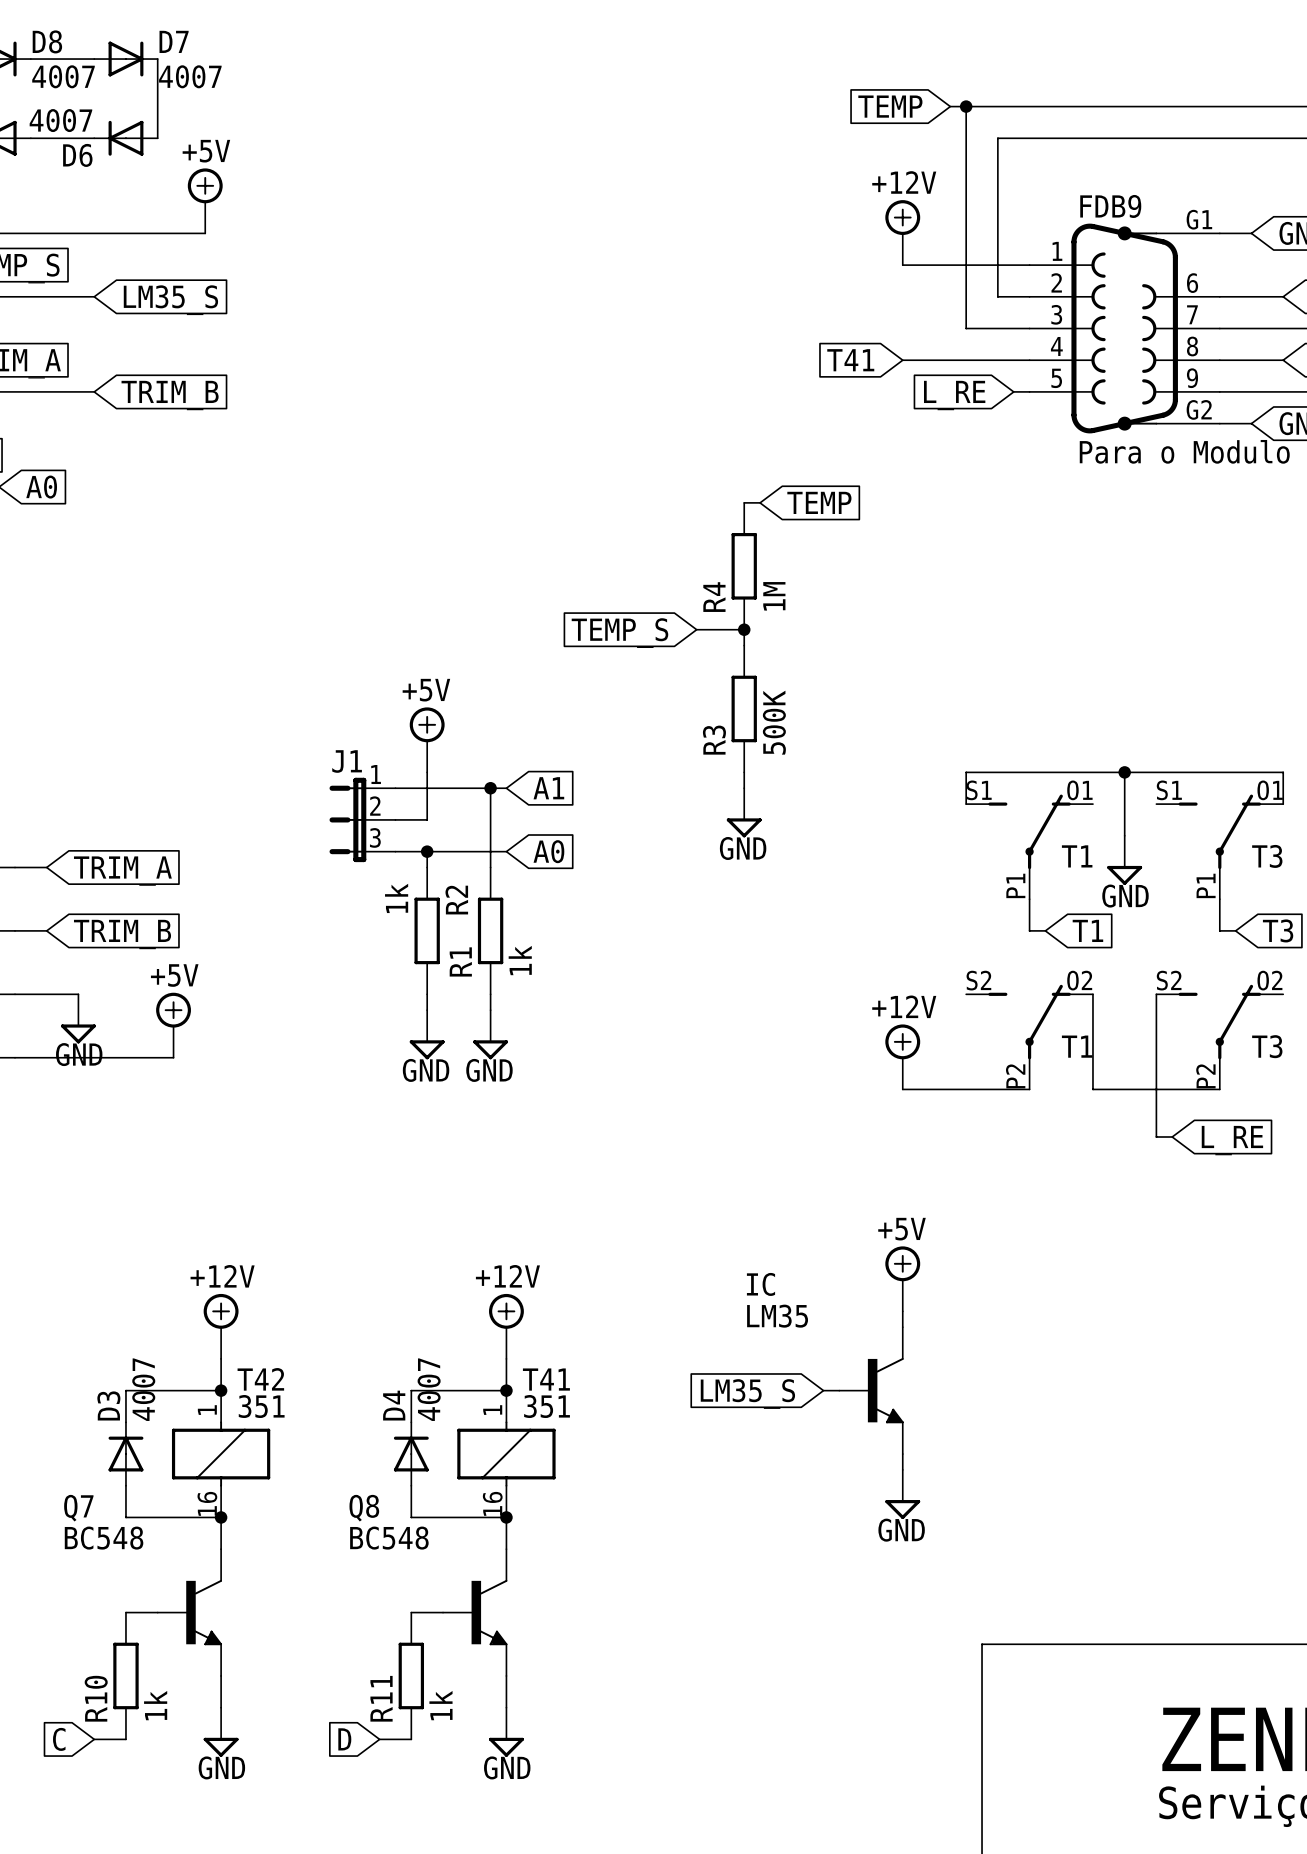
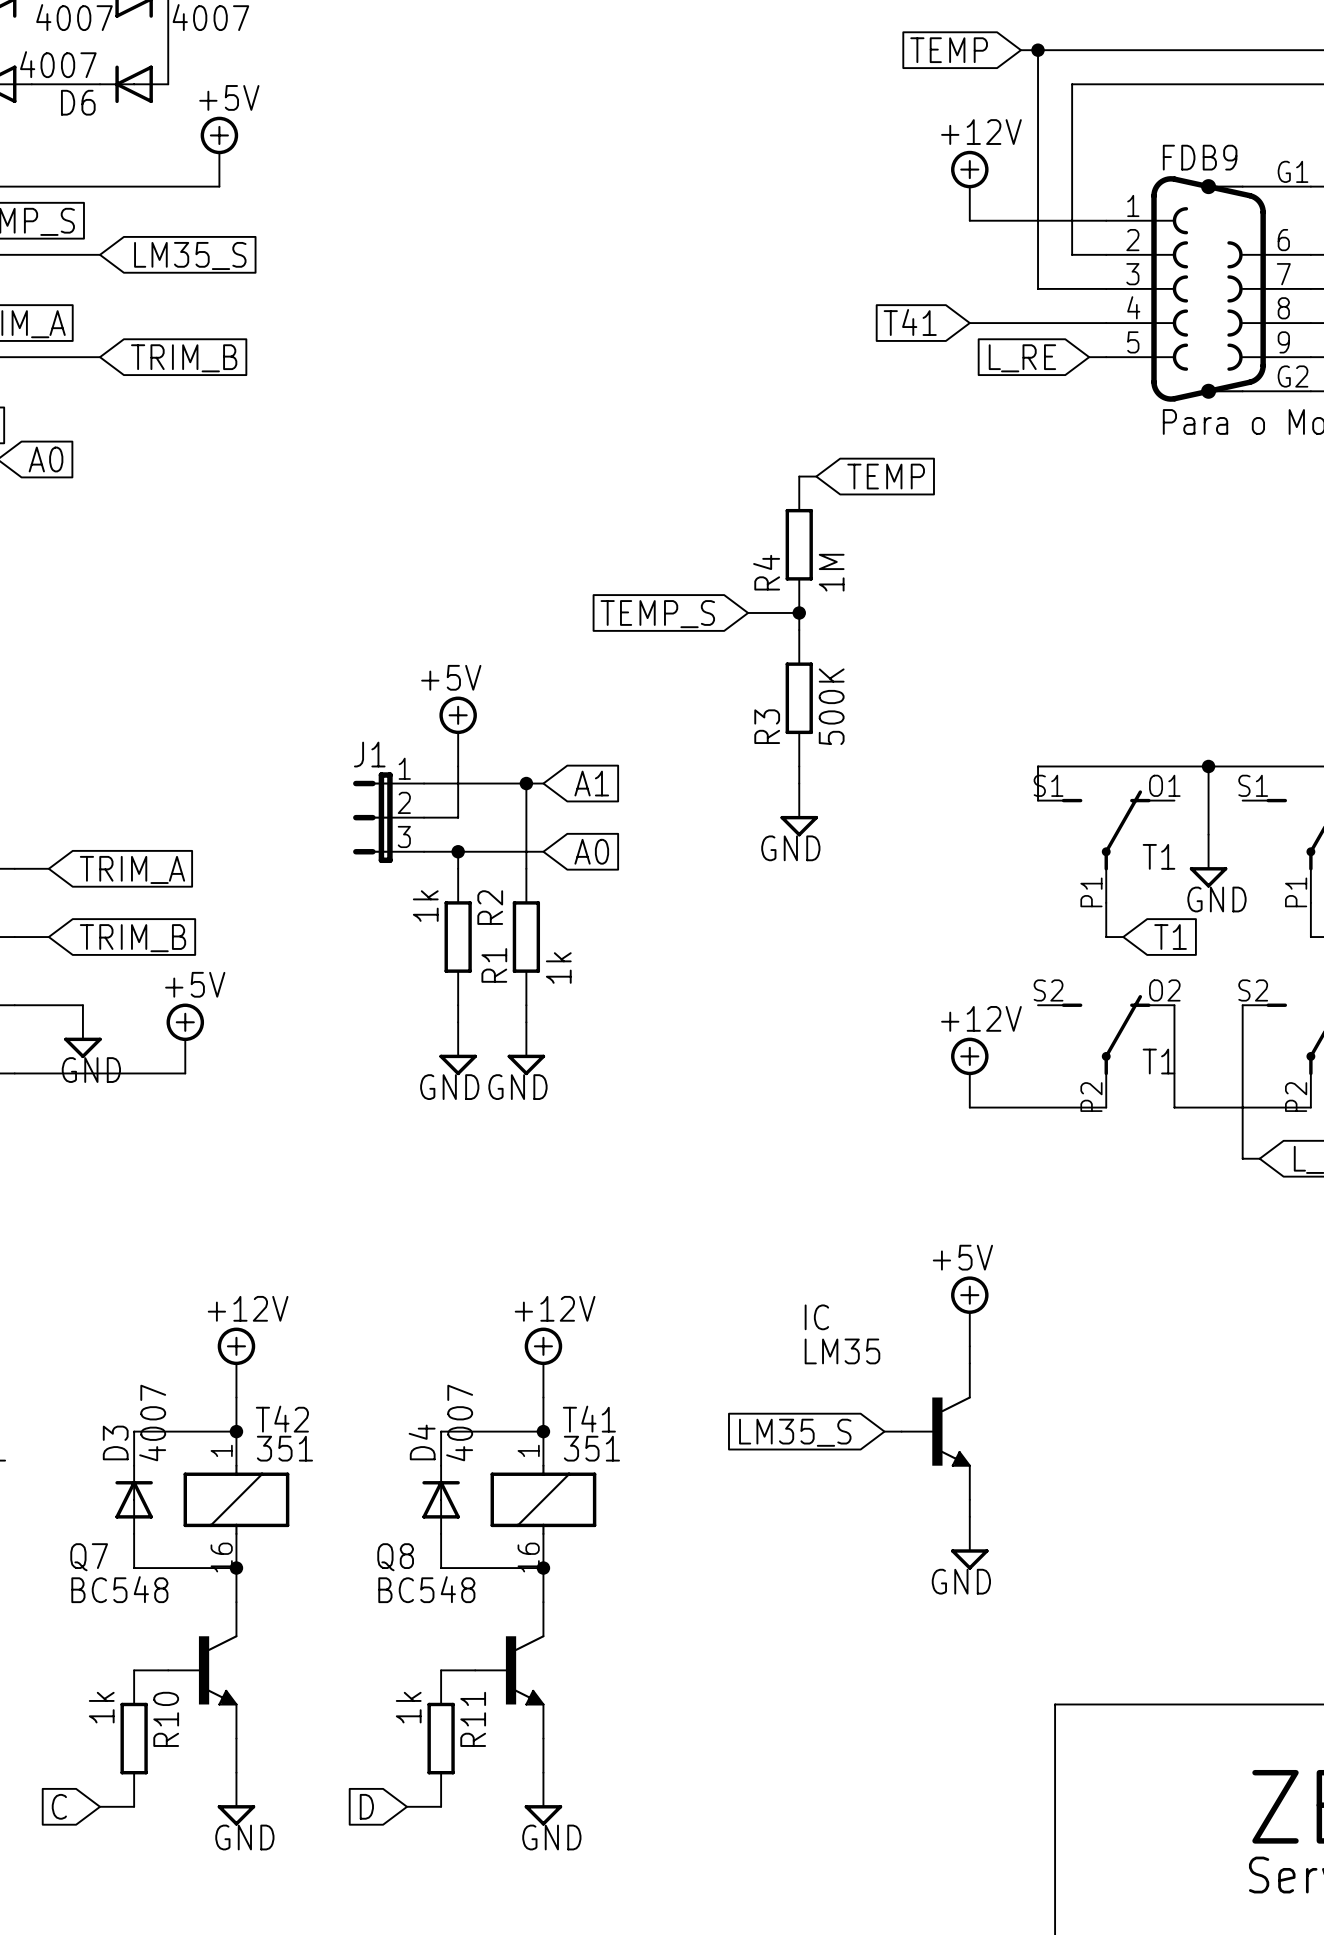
R10 name position: R10 (96, 1698) -> R10 (166, 1719)
R11 name position: R11 (381, 1698) -> R11 (473, 1719)
R10 value position: 1k (155, 1705) -> 1k (101, 1707)
R11 value position: 1k (440, 1705) -> 1k (408, 1707)

